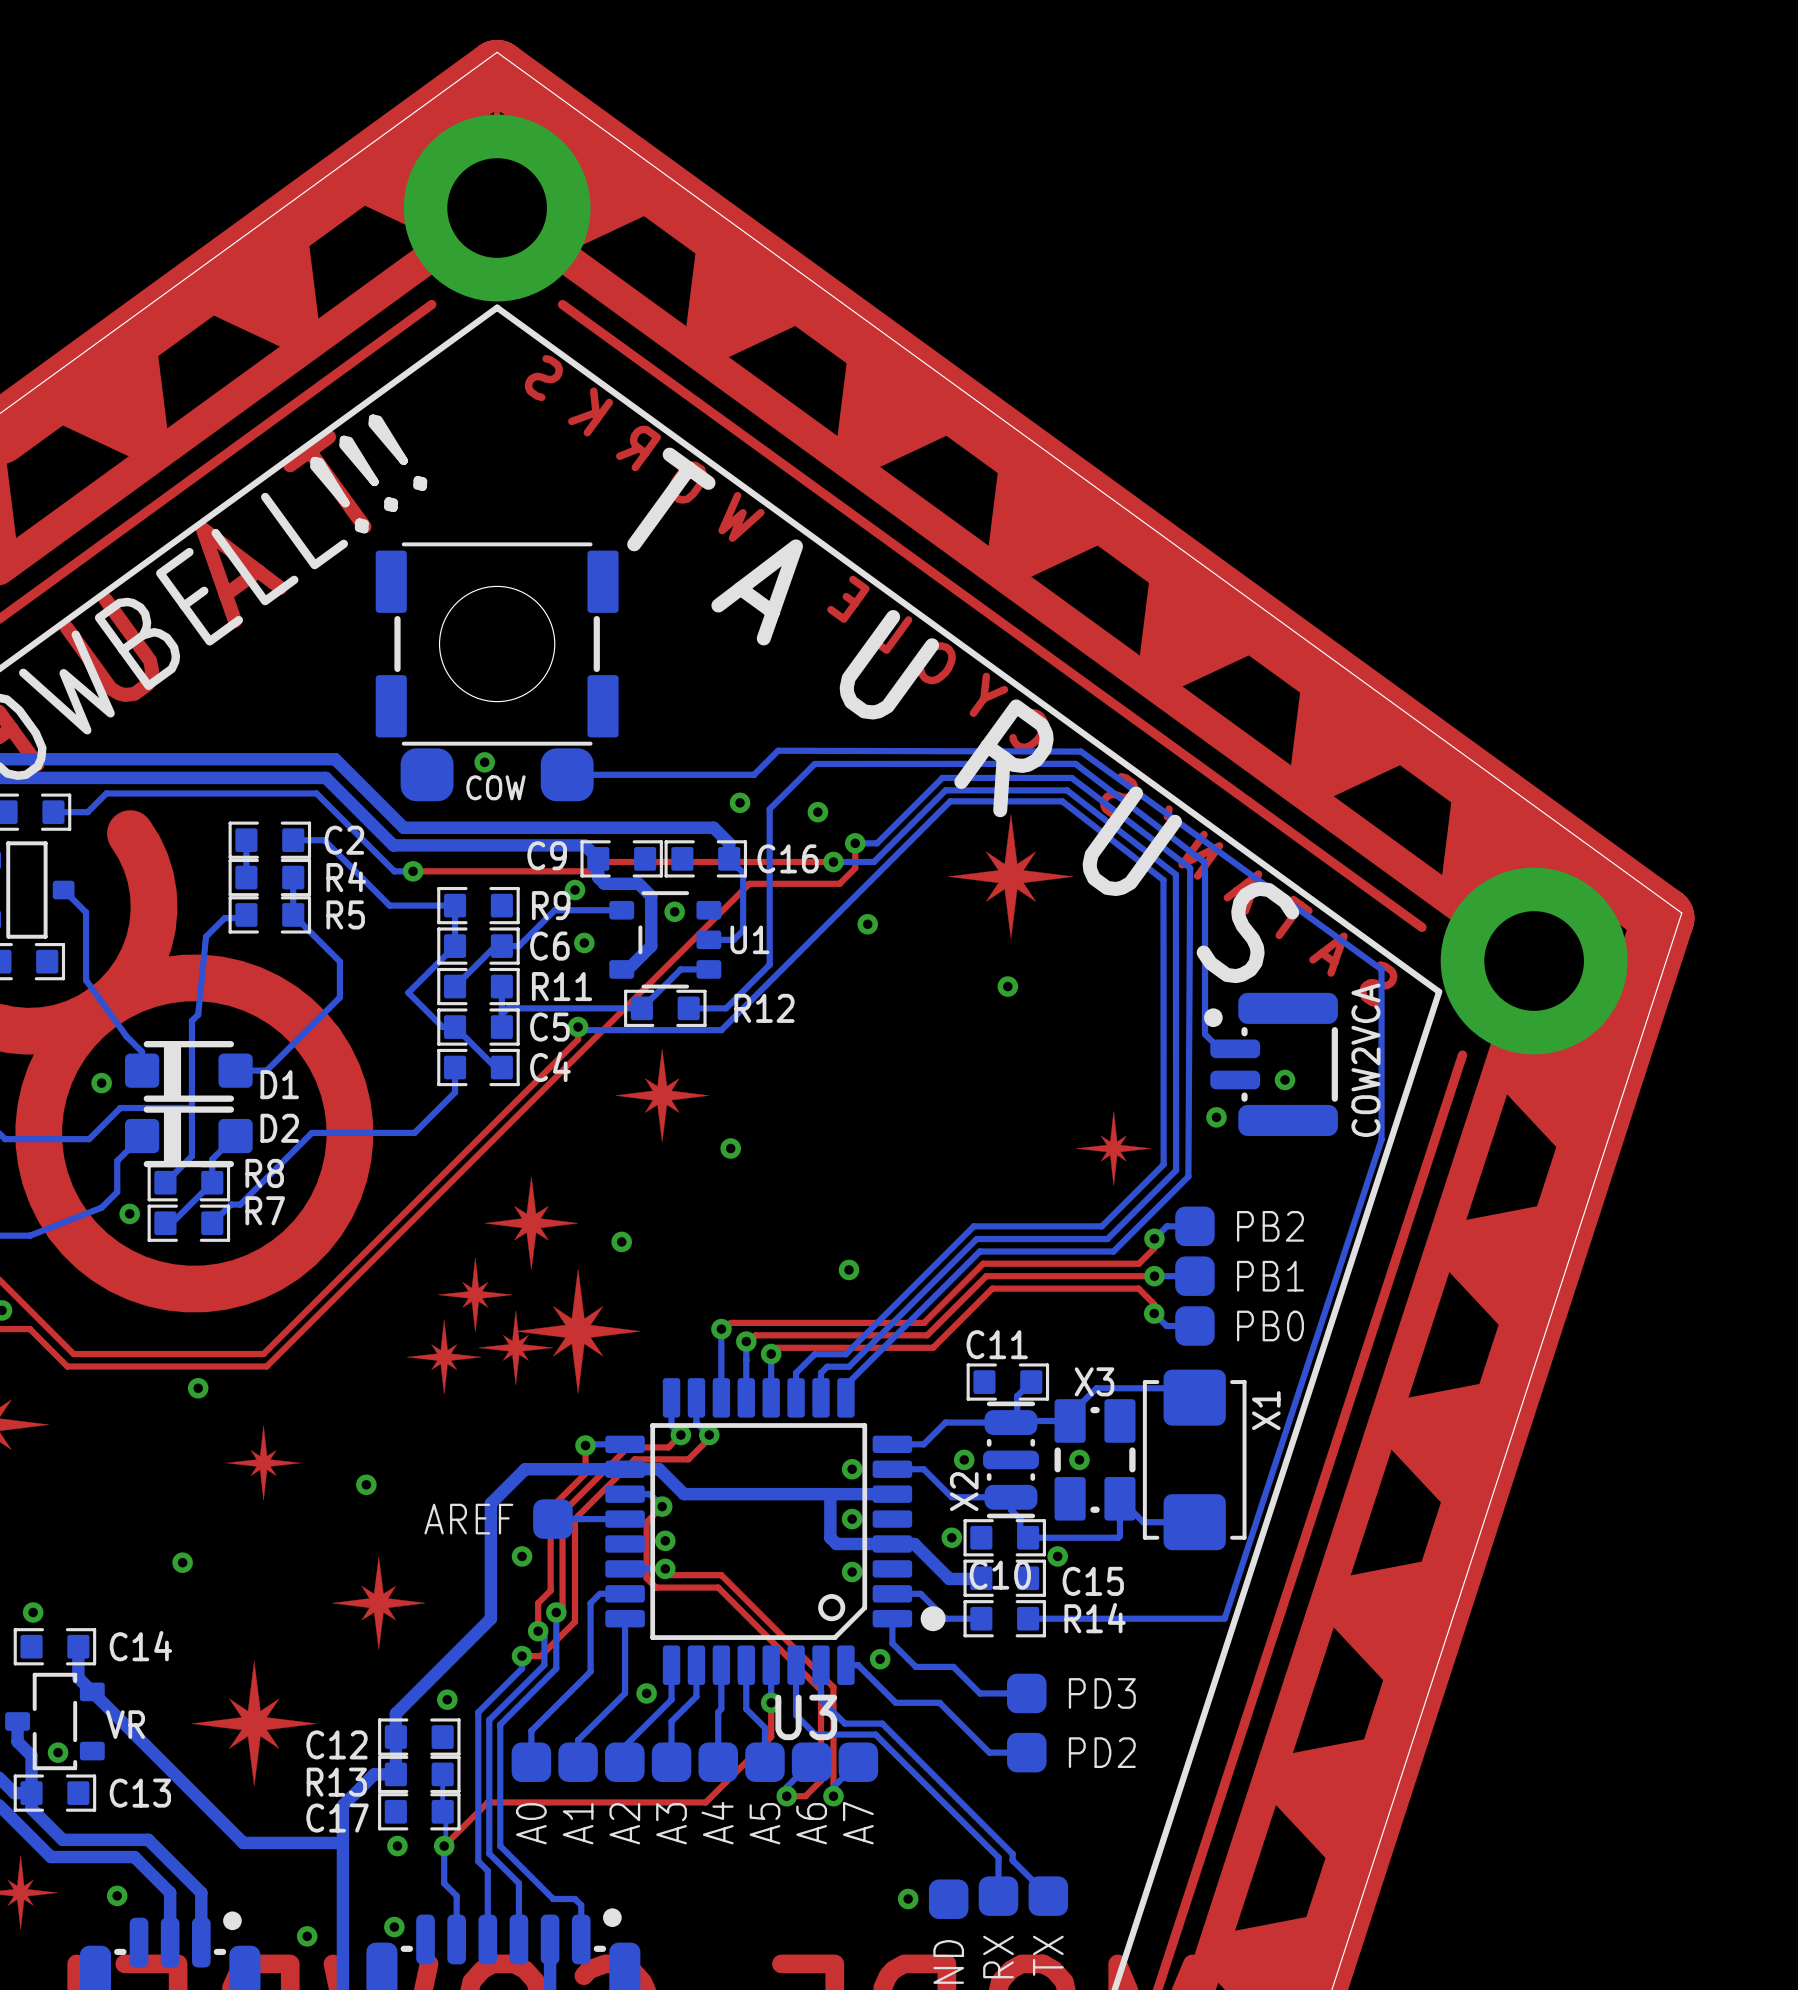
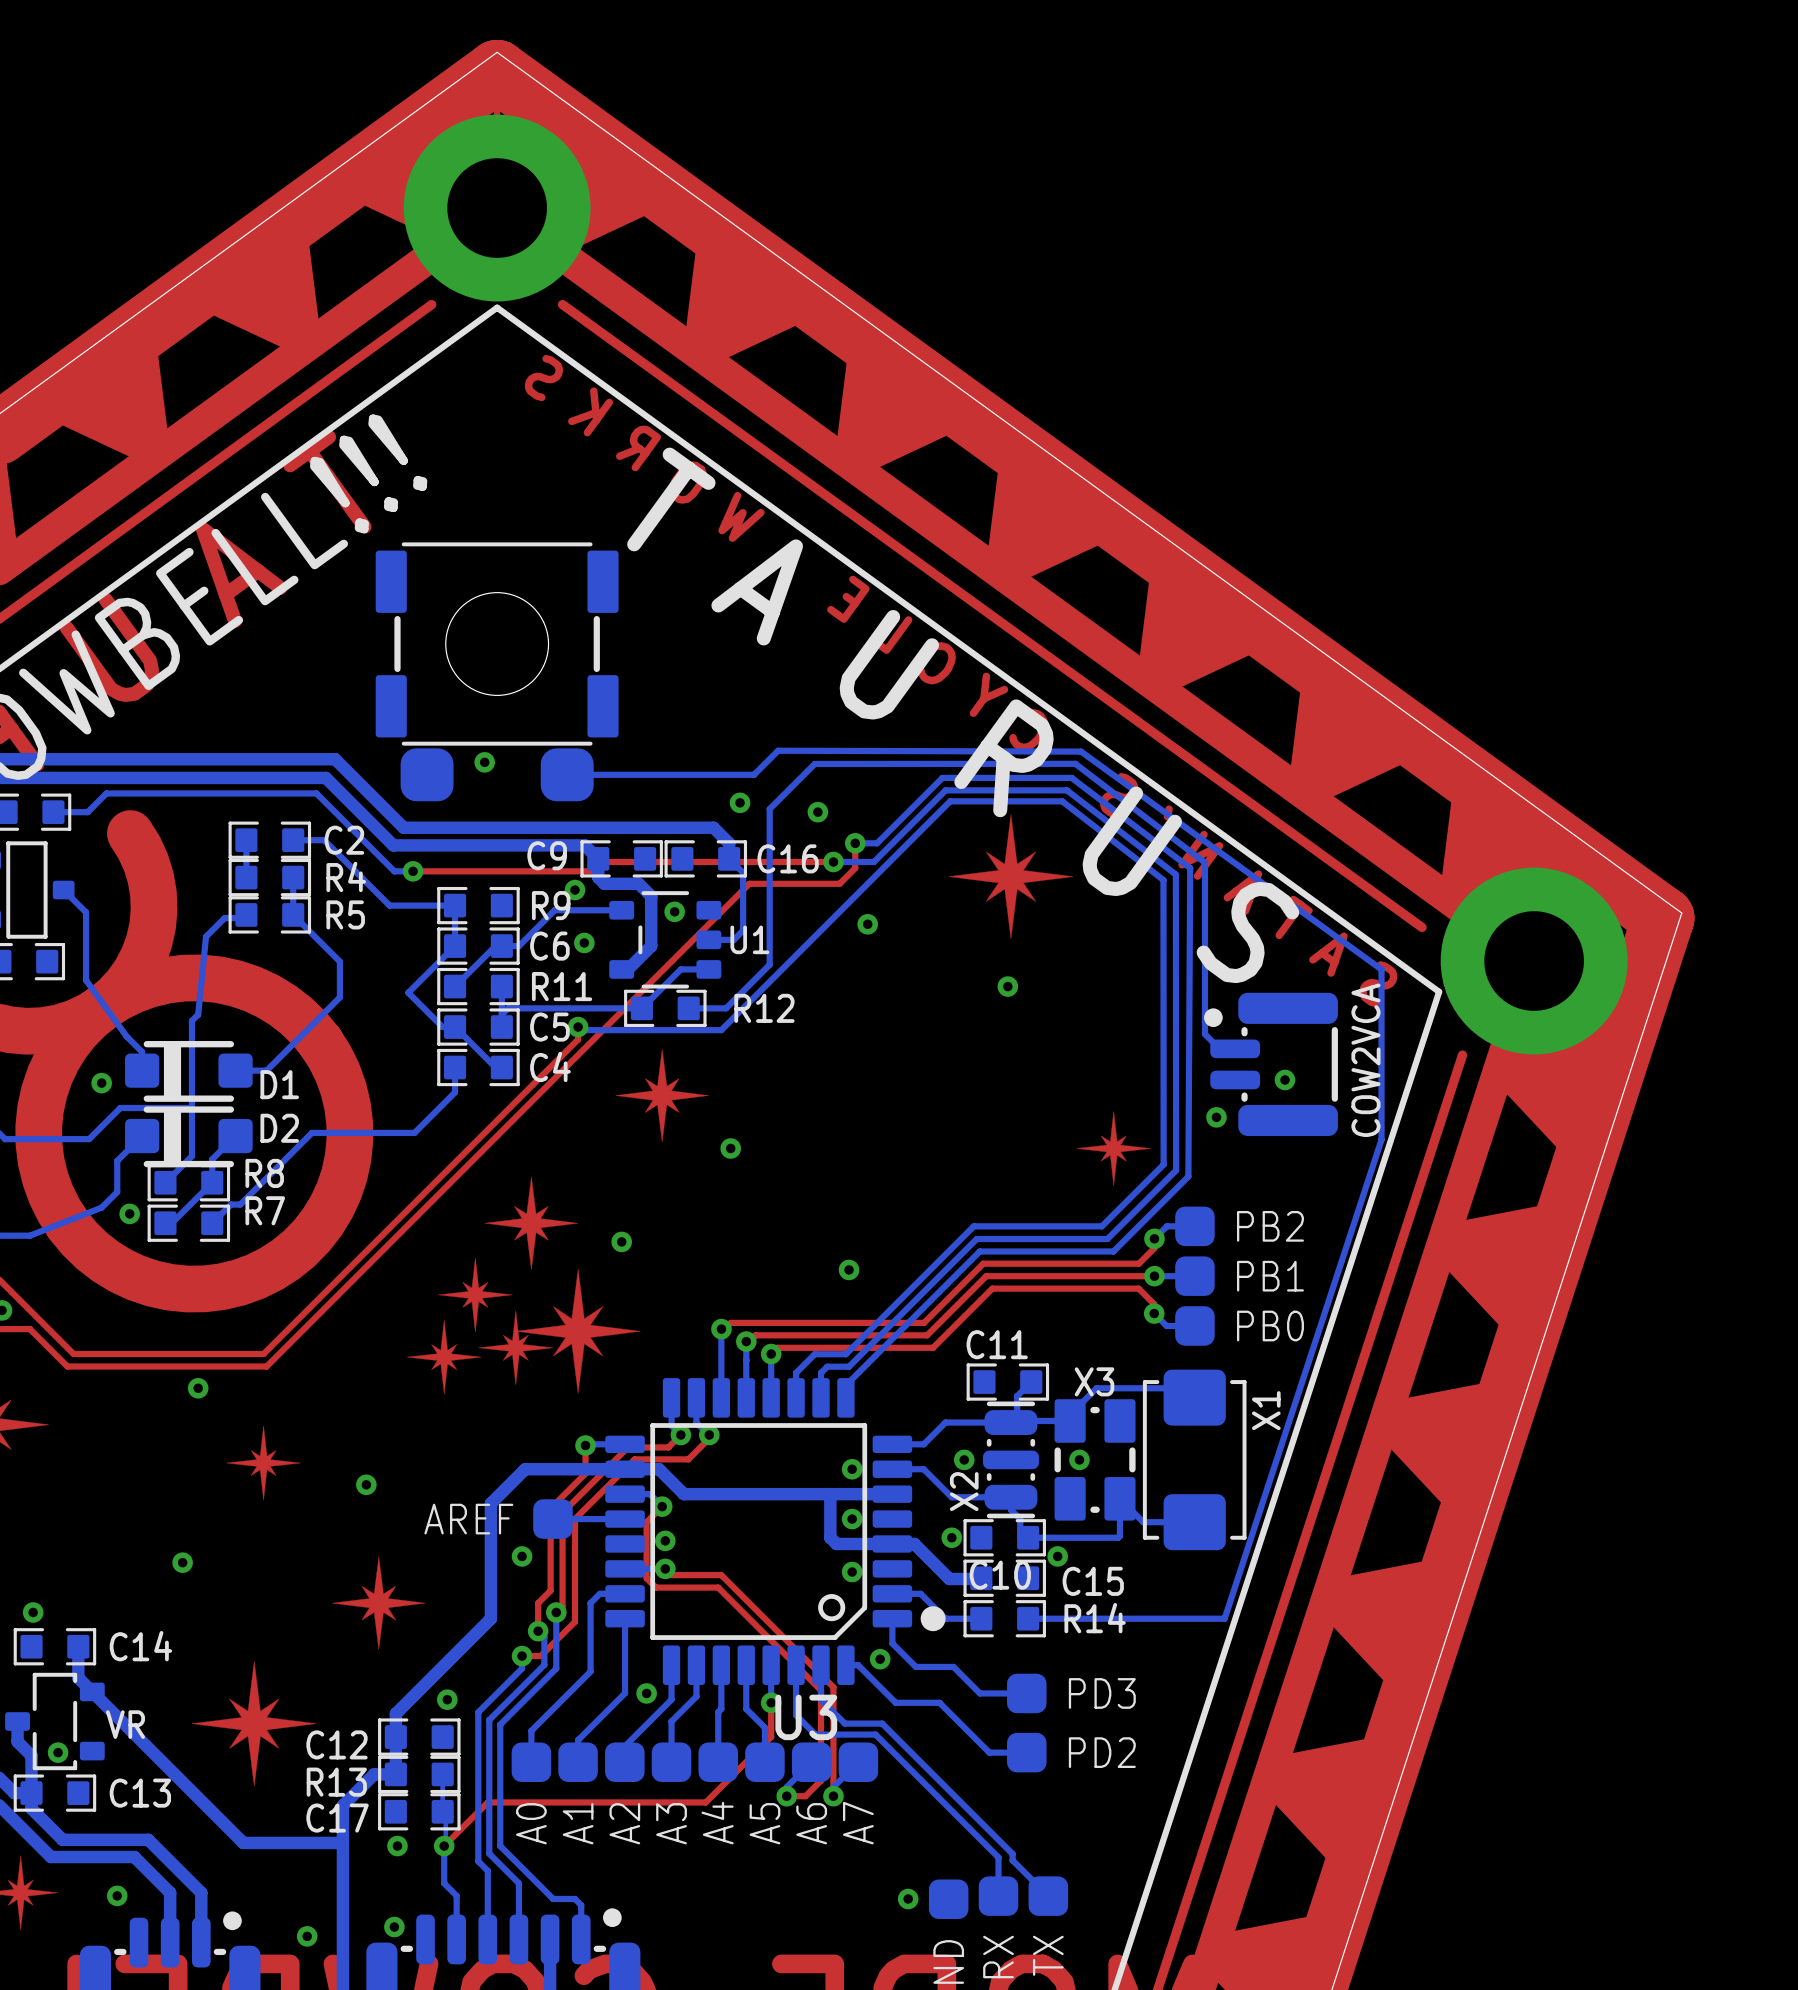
COW: (497, 671) -> none
part: none -> (497, 671)

